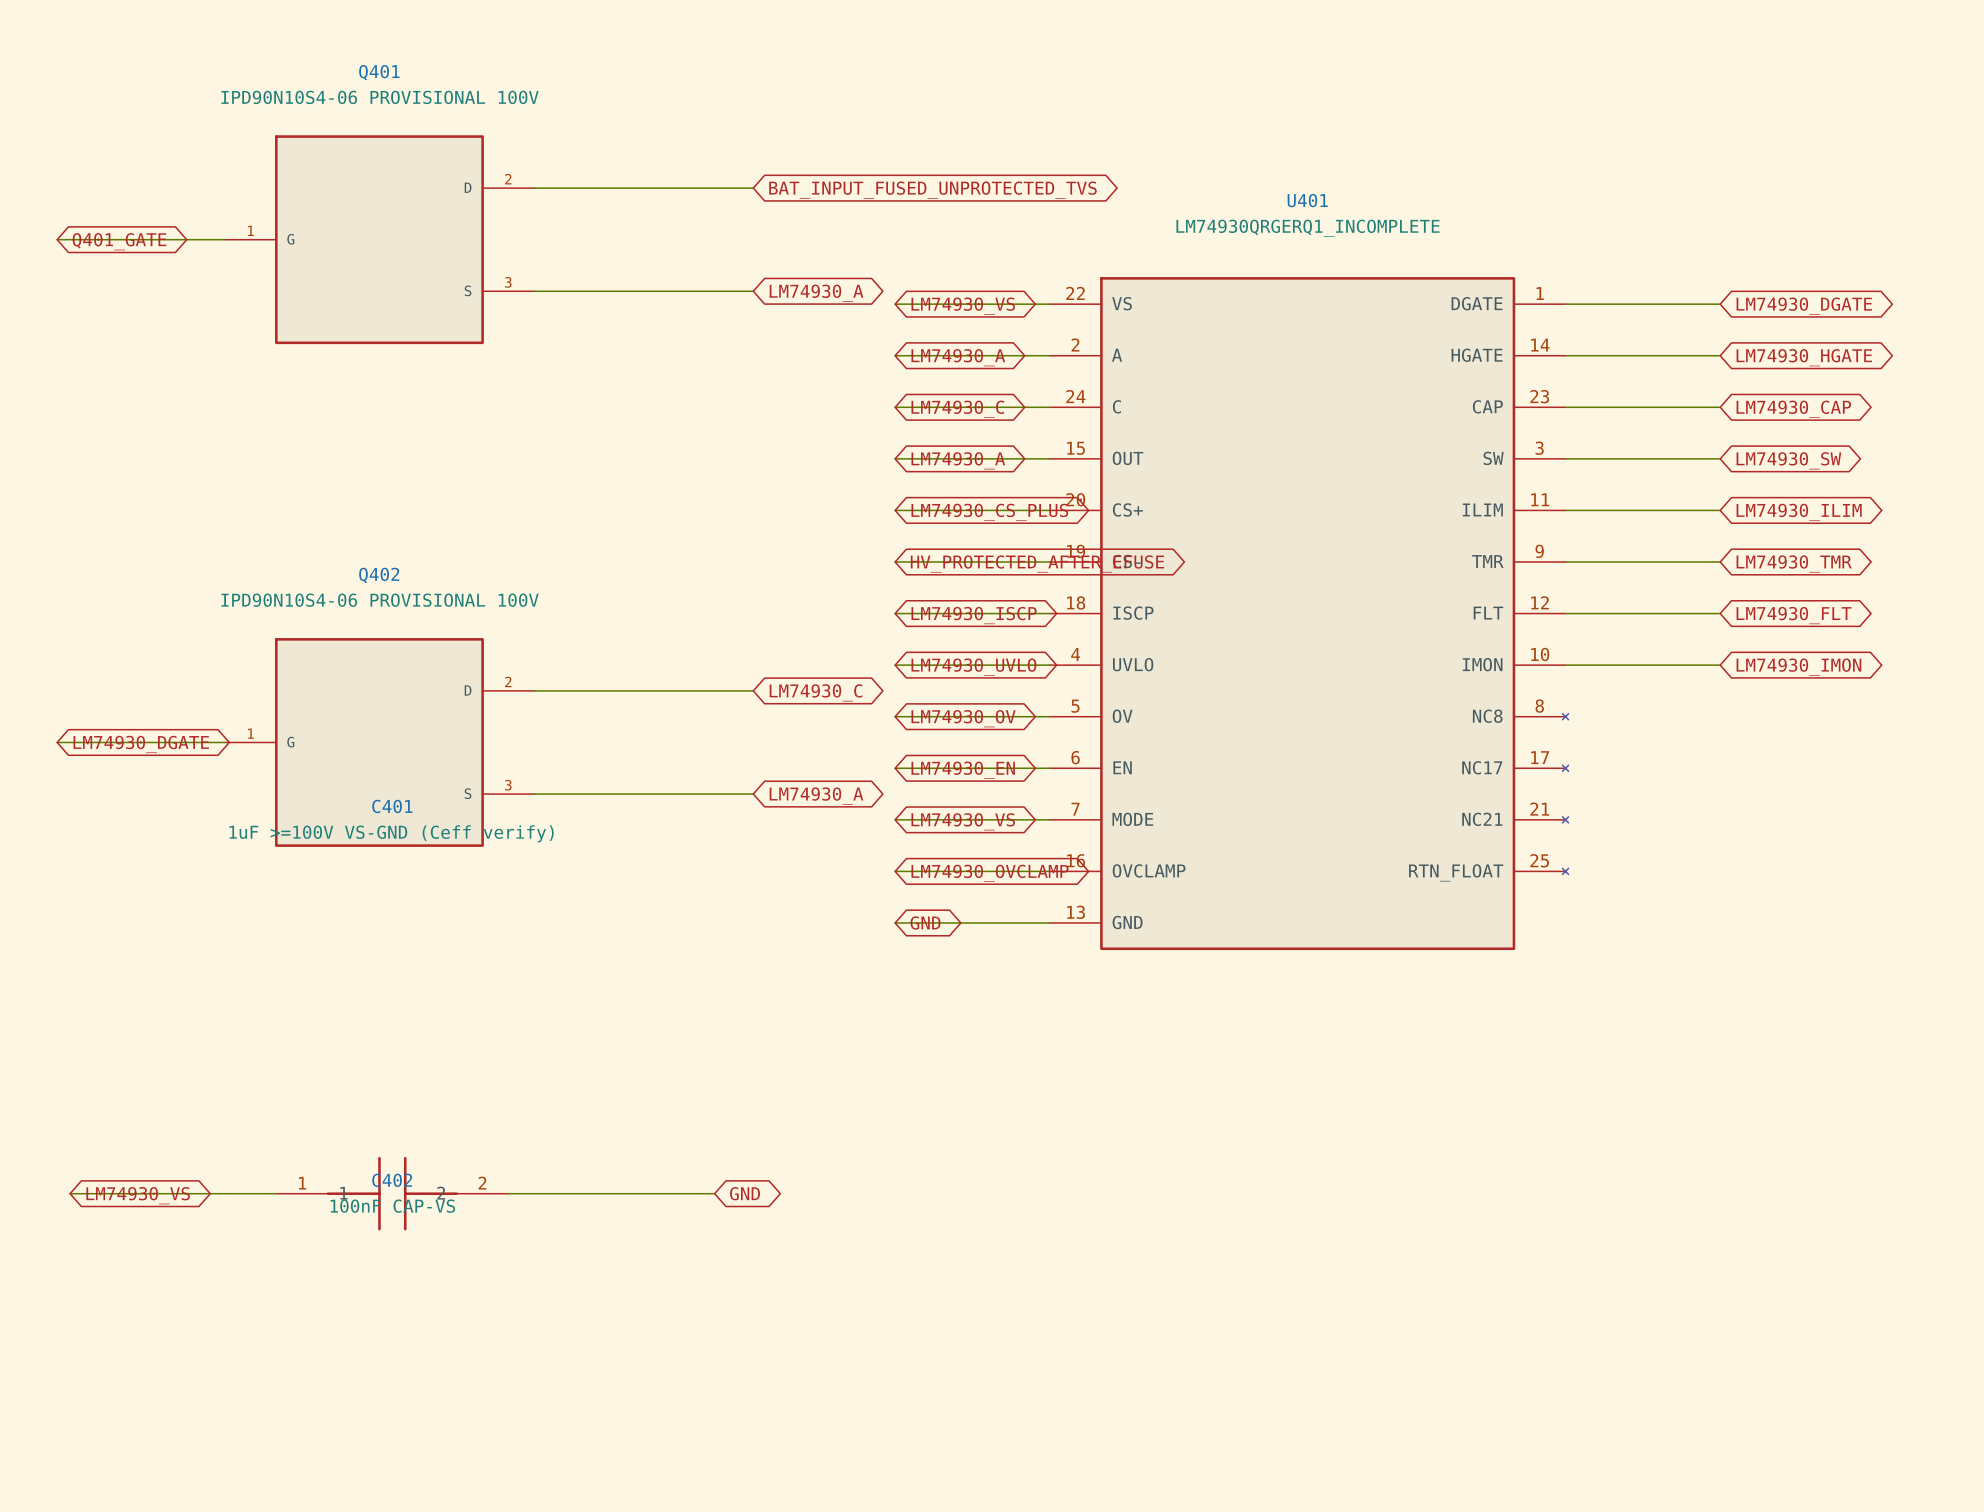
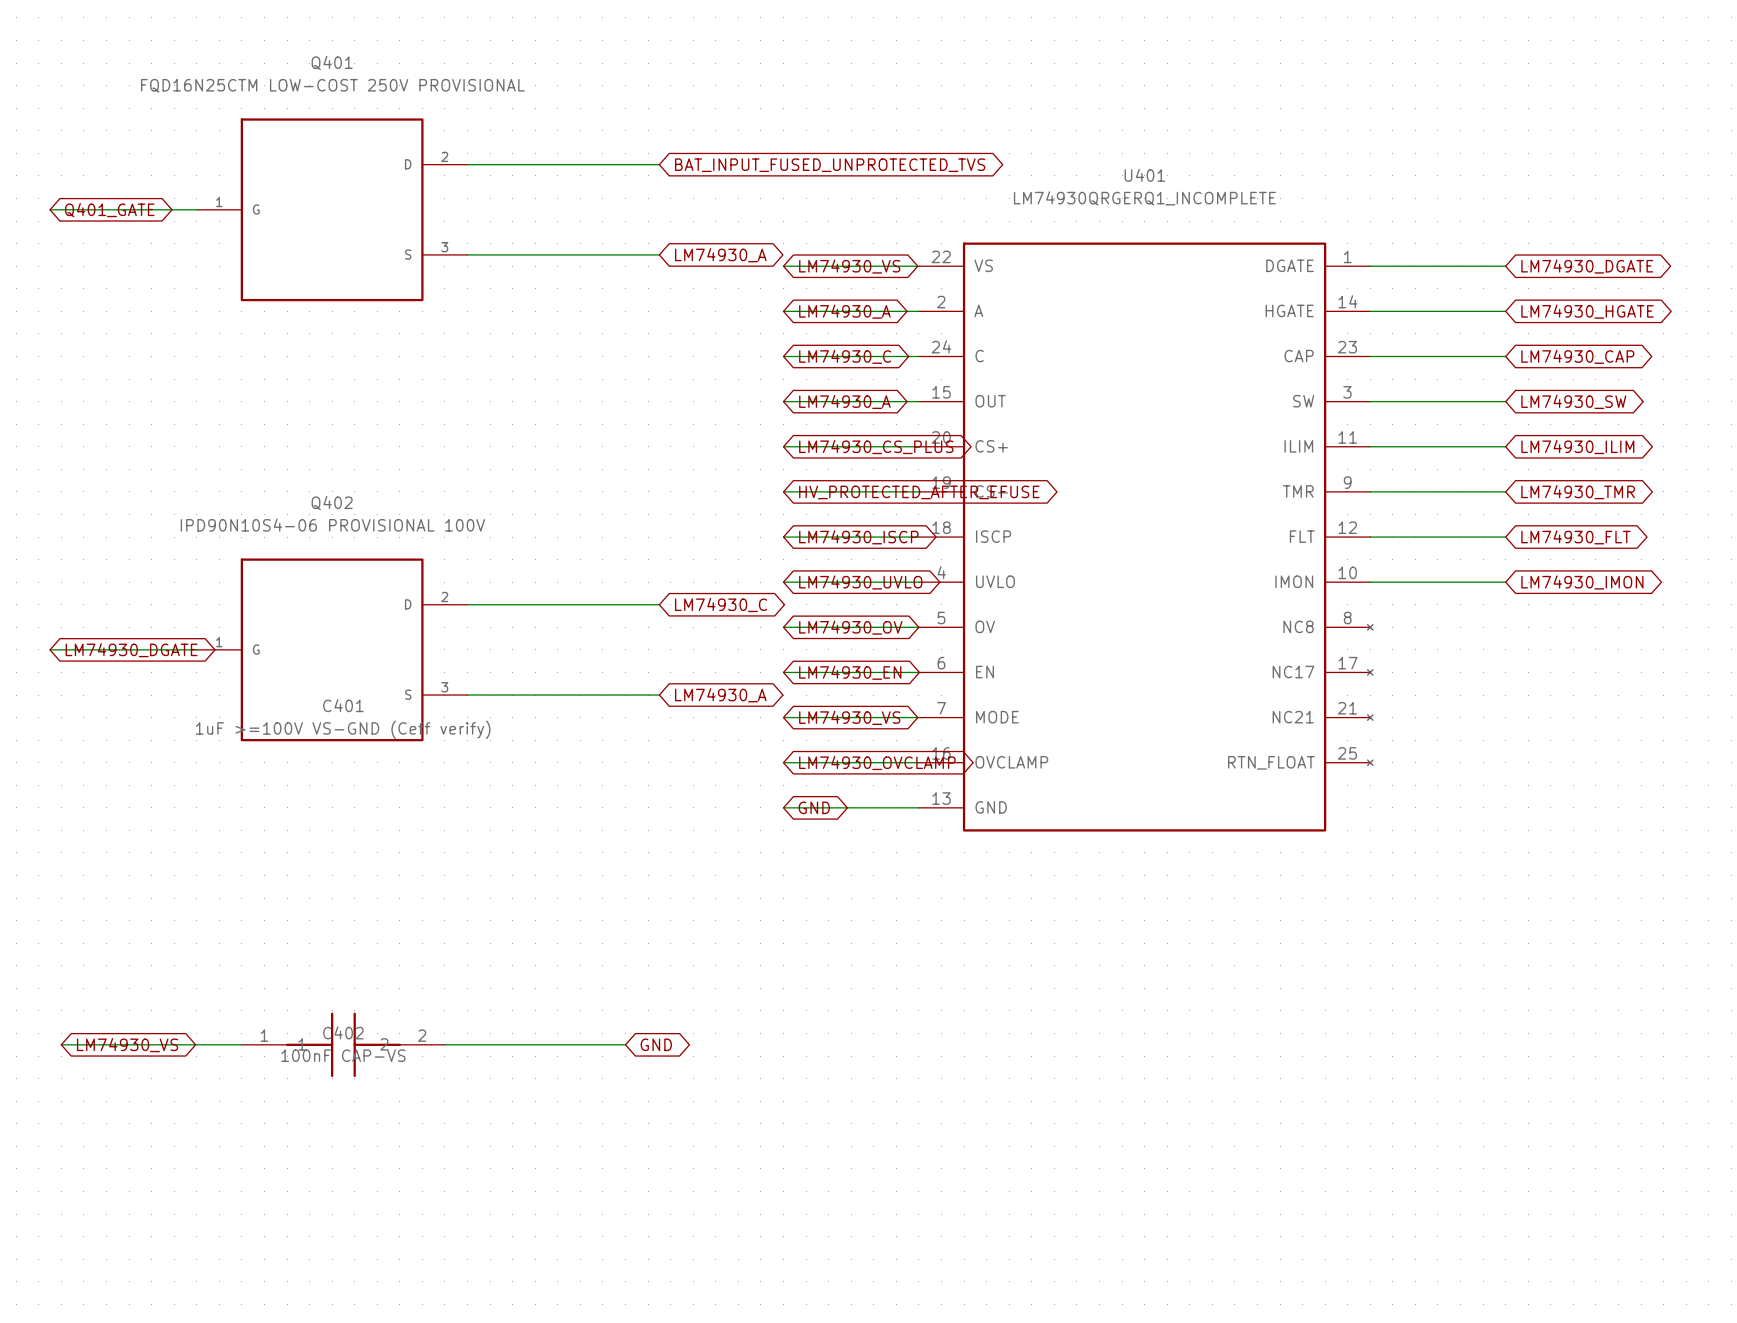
Q401 value: IPD90N10S4-06 PROVISIONAL 100V (380, 97) -> FQD16N25CTM LOW-COST 250V PROVISIONAL (332, 85)

